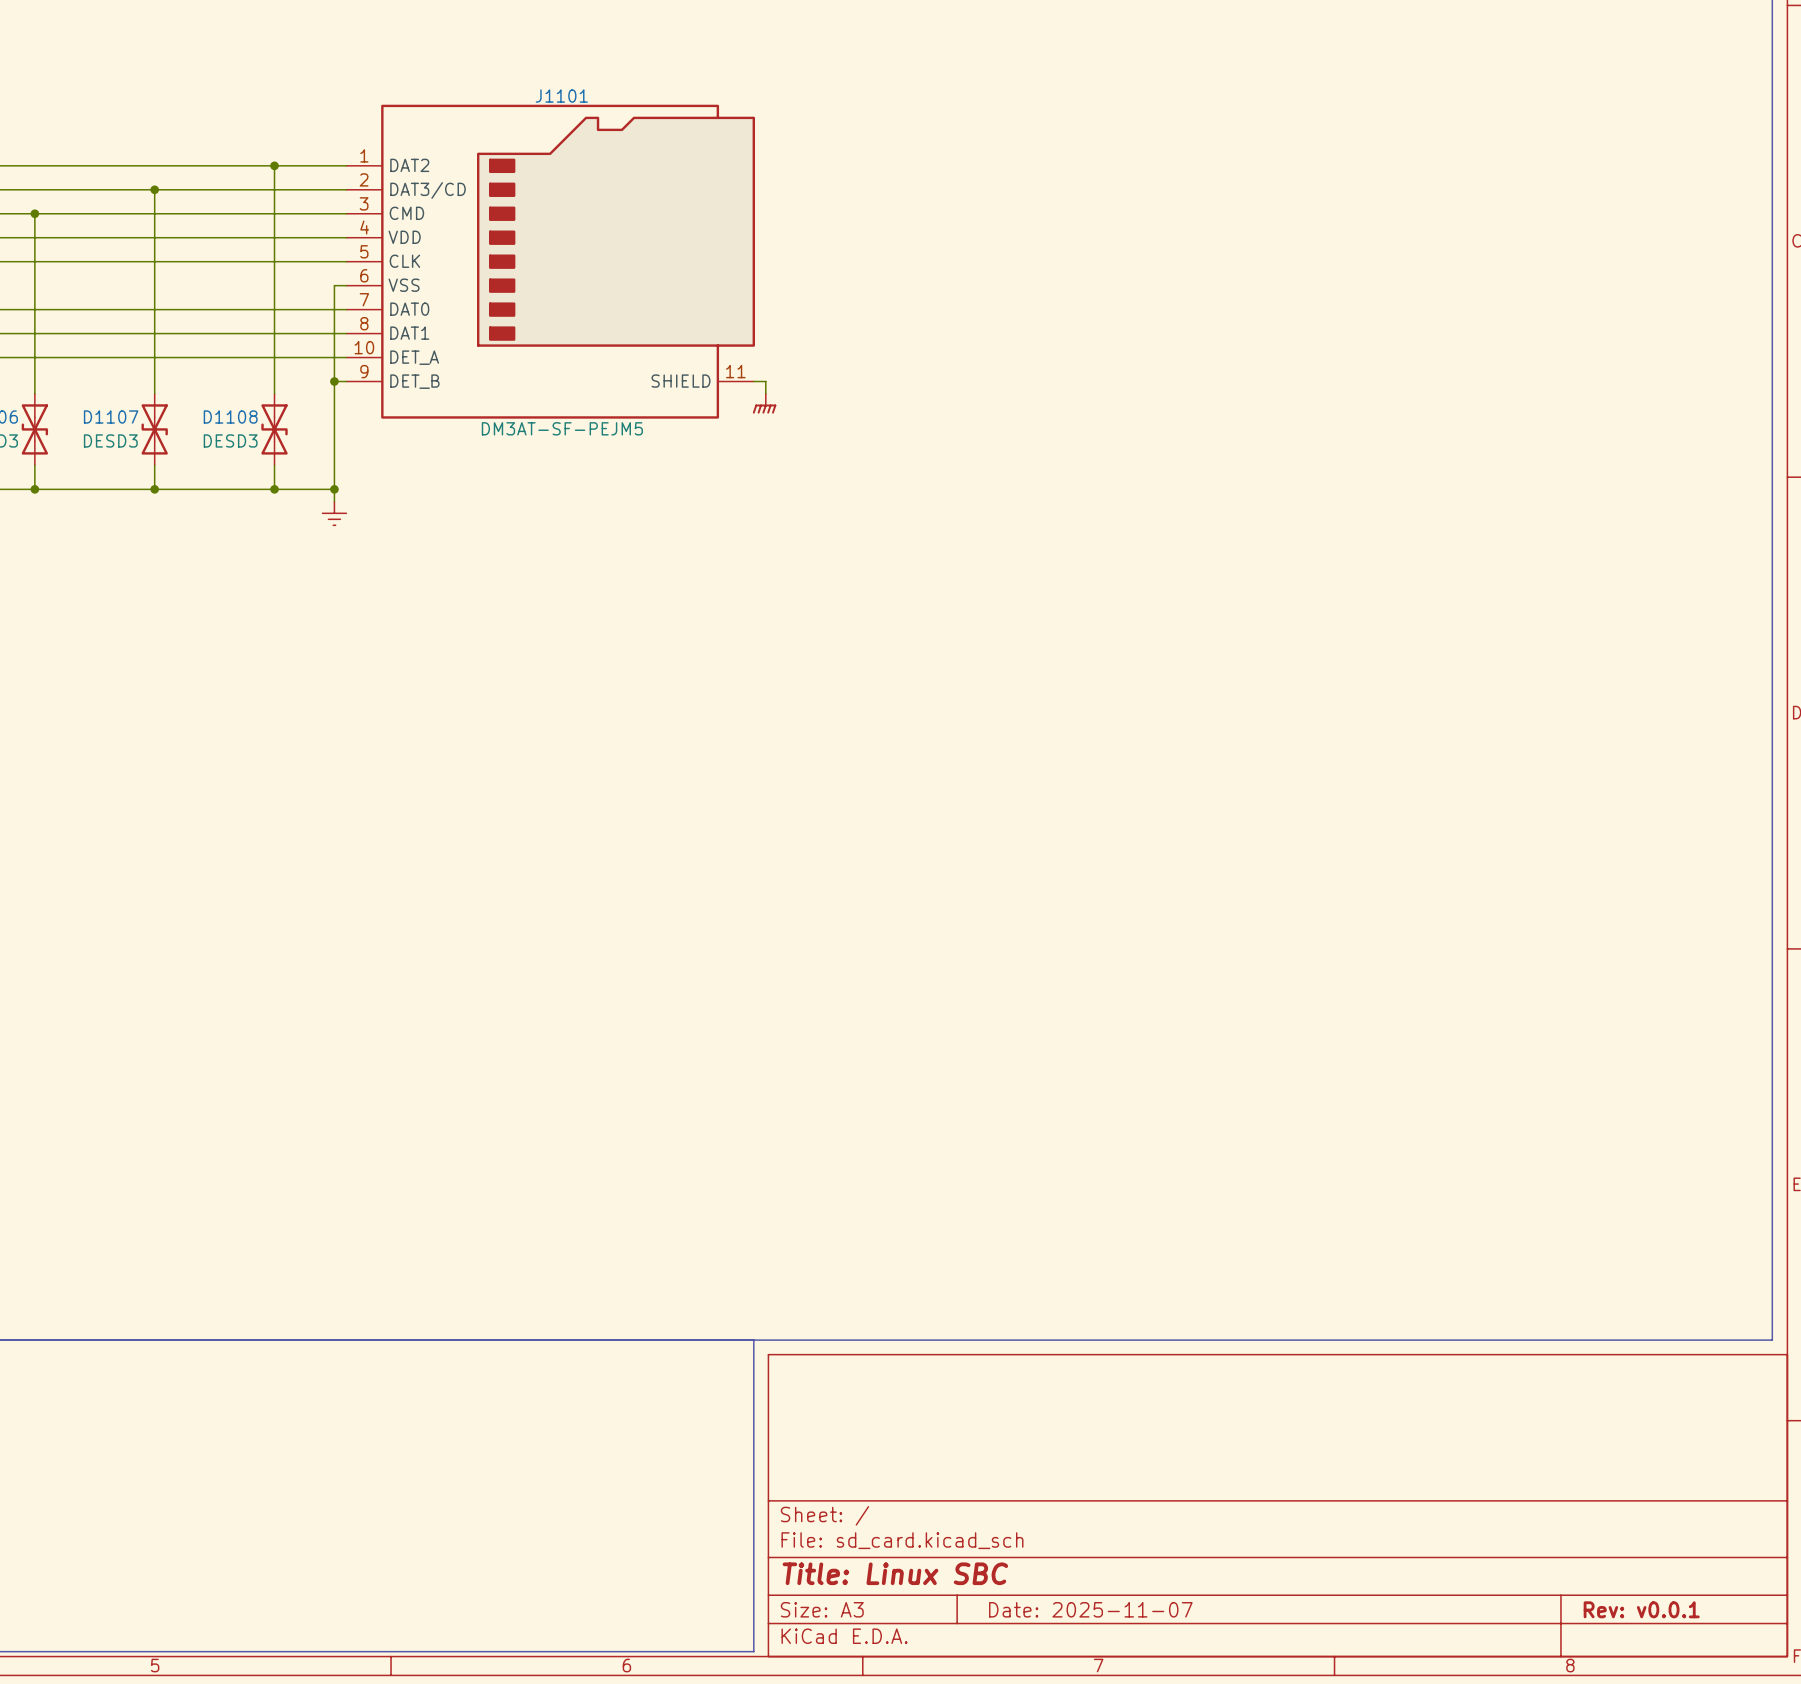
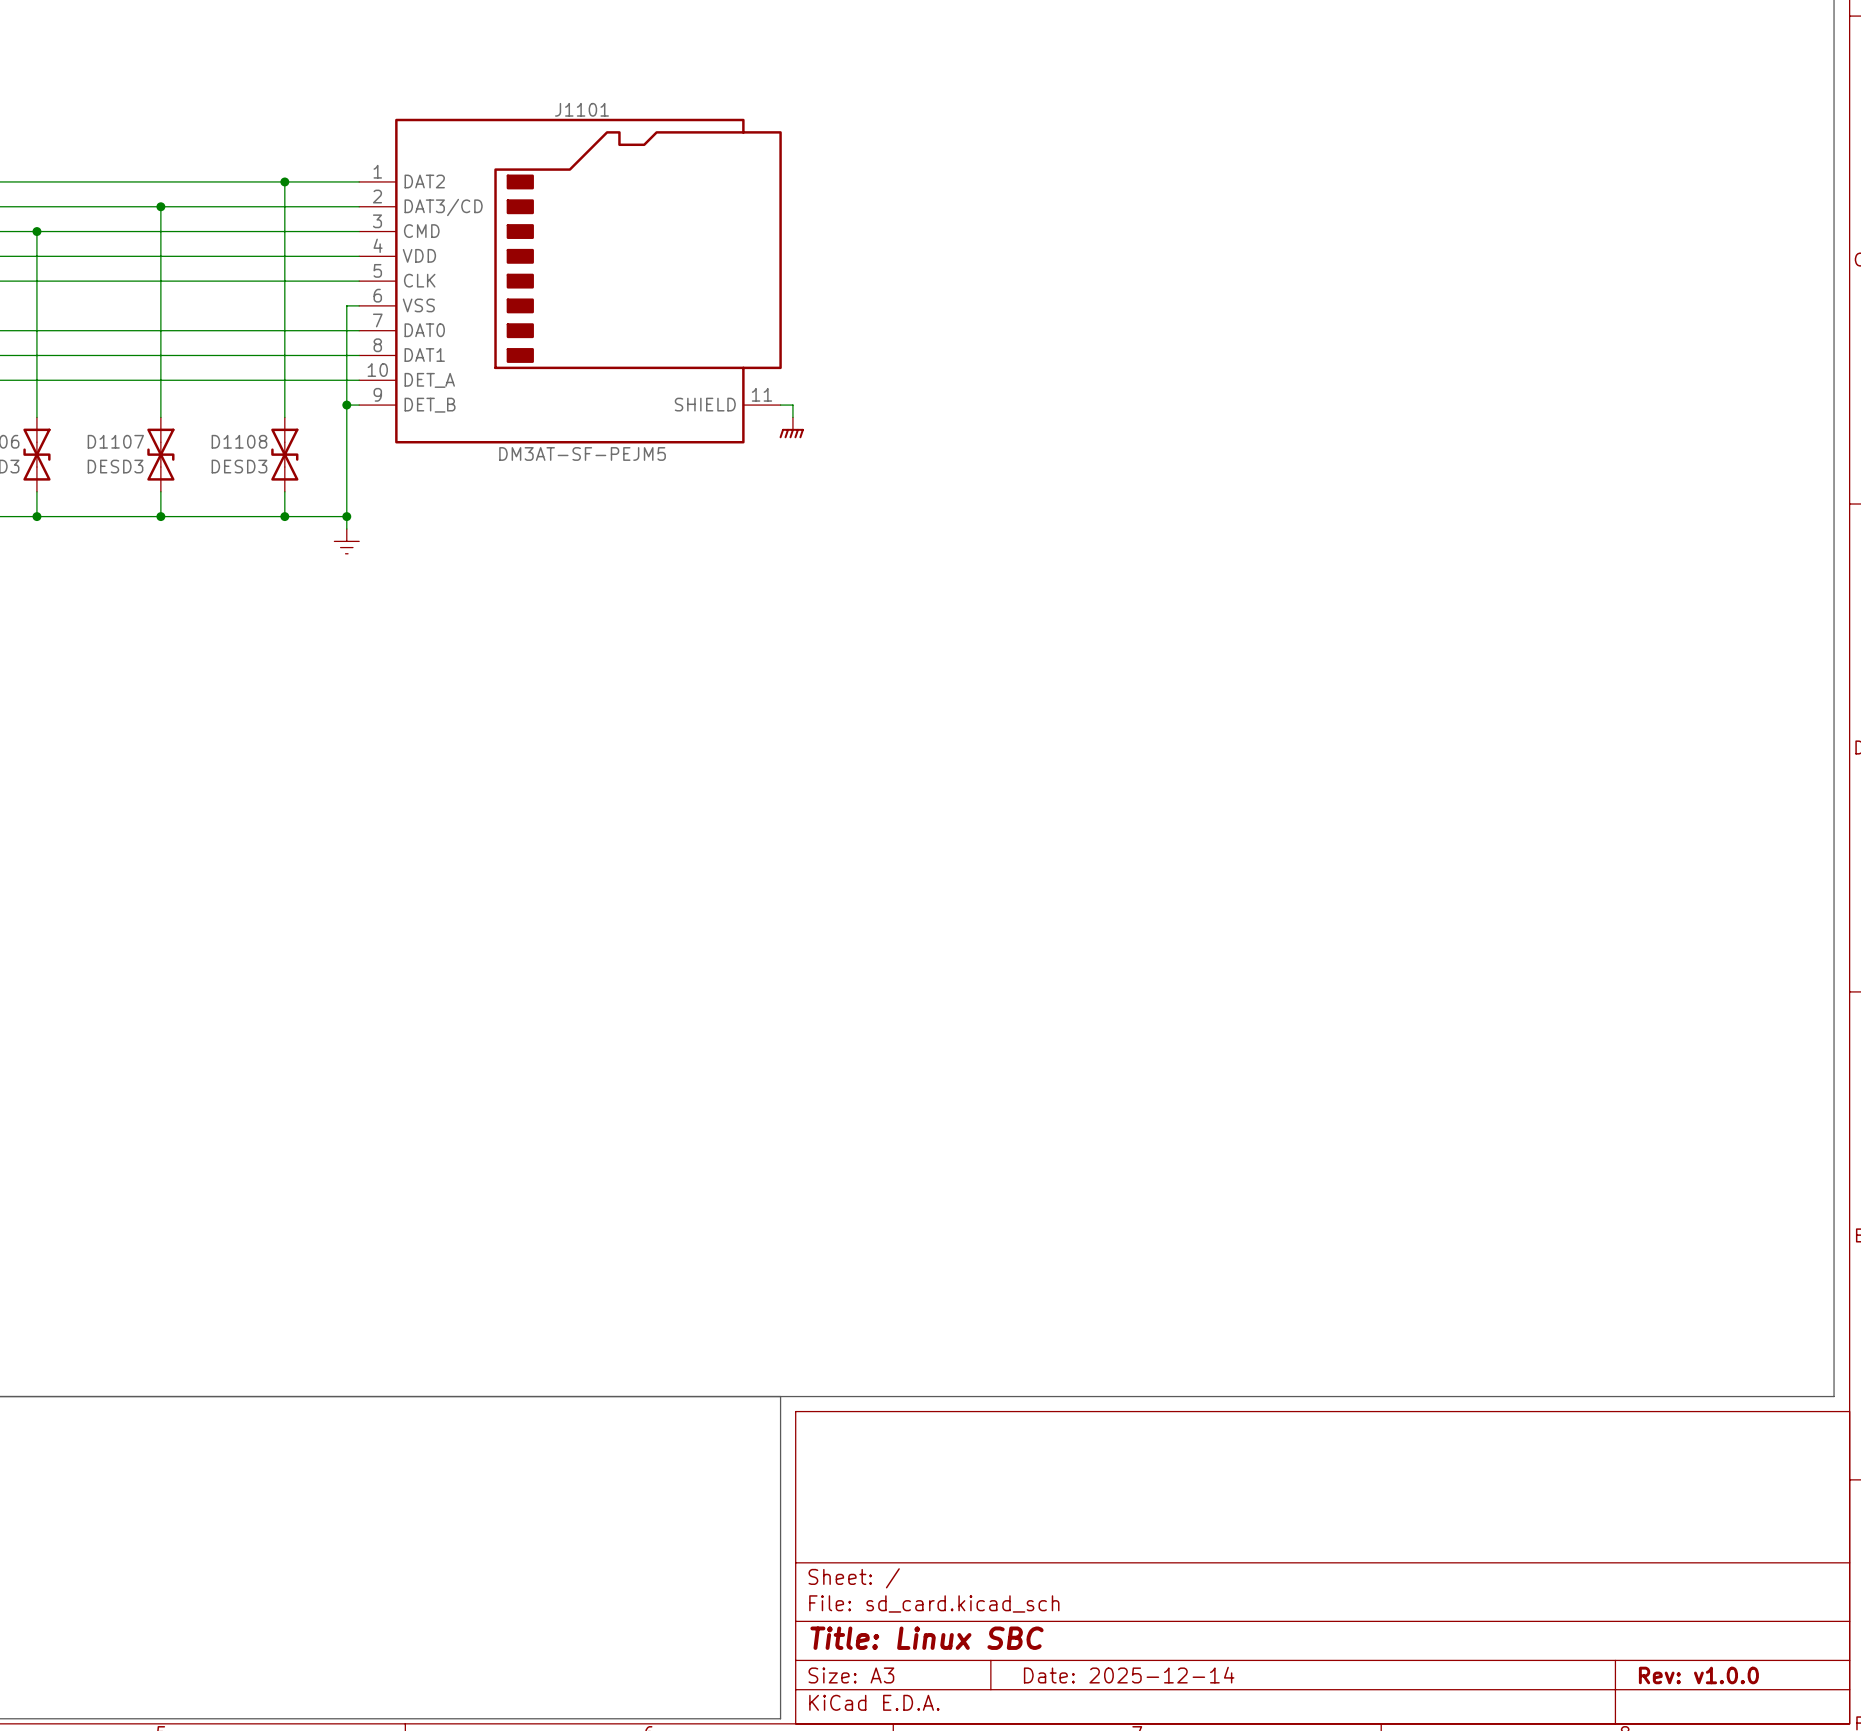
title block: Date: 2025-11-07 (1090, 1609) -> Date: 2025-12-14 (1129, 1675)
title block: Rev: v0.0.1 (1641, 1609) -> Rev: v1.0.0 (1698, 1675)

